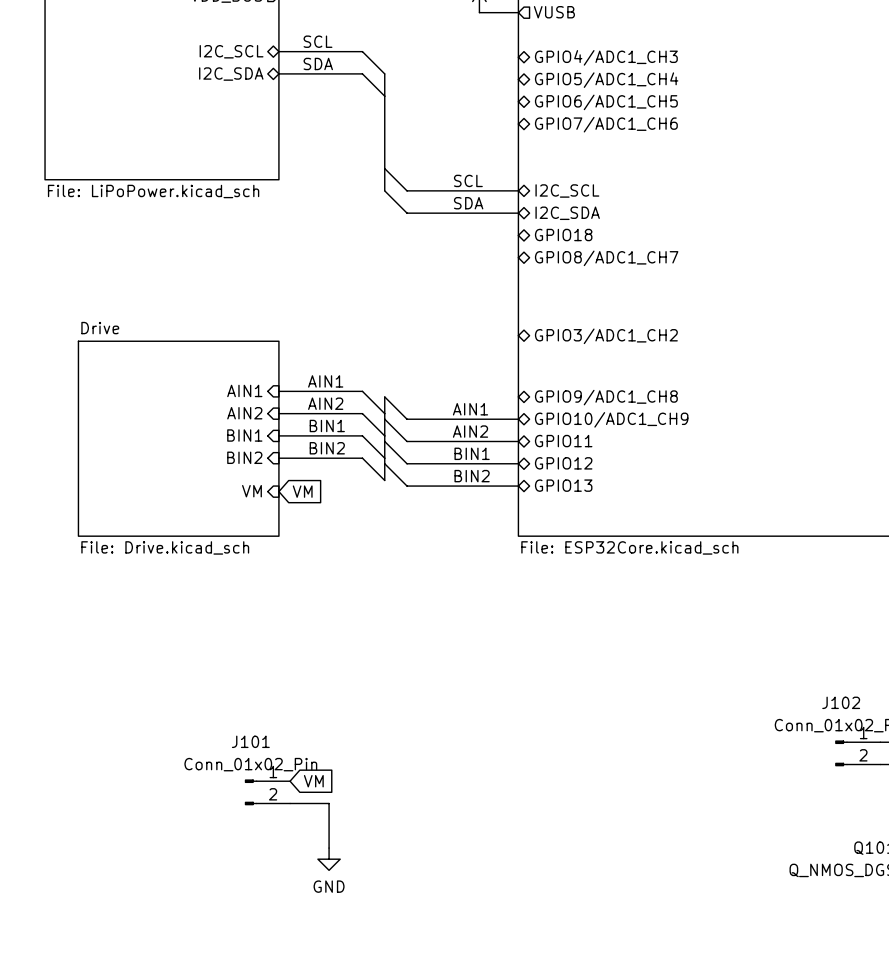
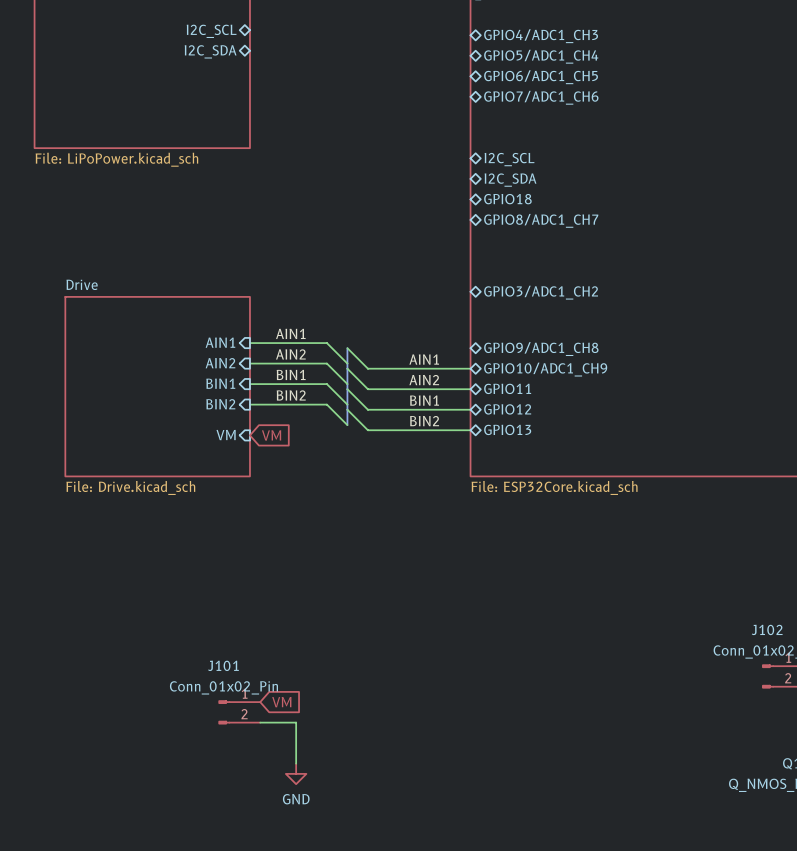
label: SCL (318, 41) -> none
wire: (278, 51) (362, 51) (384, 73) -> none
label: SDA (318, 63) -> none
wire: (278, 73) (362, 73) (384, 96) -> none
bus: (384, 73) (384, 190) -> none
wire: (384, 168) (407, 190) -> none
label: SCL (468, 180) -> none
wire: (384, 190) (407, 213) -> none
wire: (407, 190) (518, 190) -> none
label: SDA (468, 203) -> none
wire: (407, 213) (518, 213) -> none

